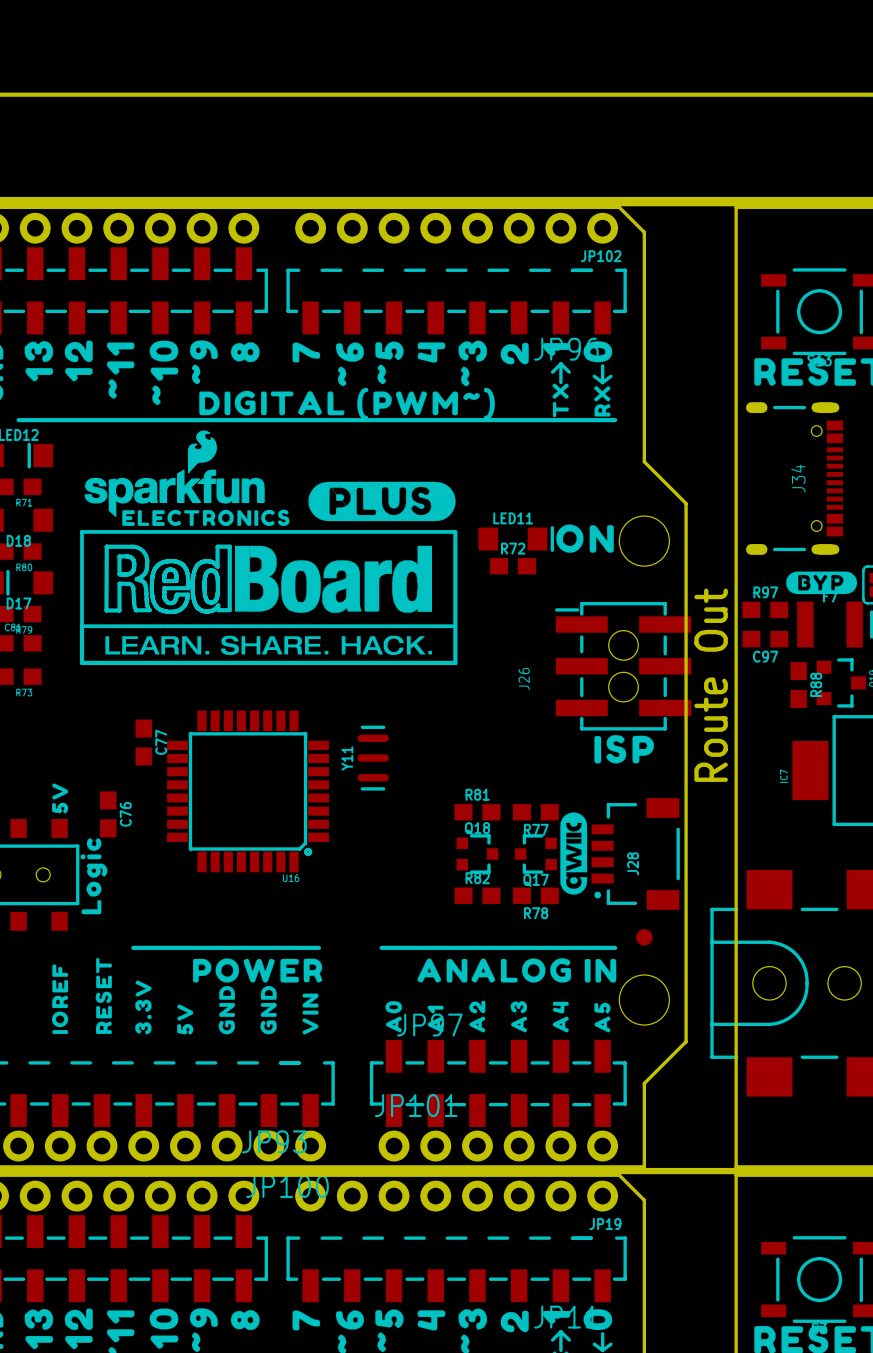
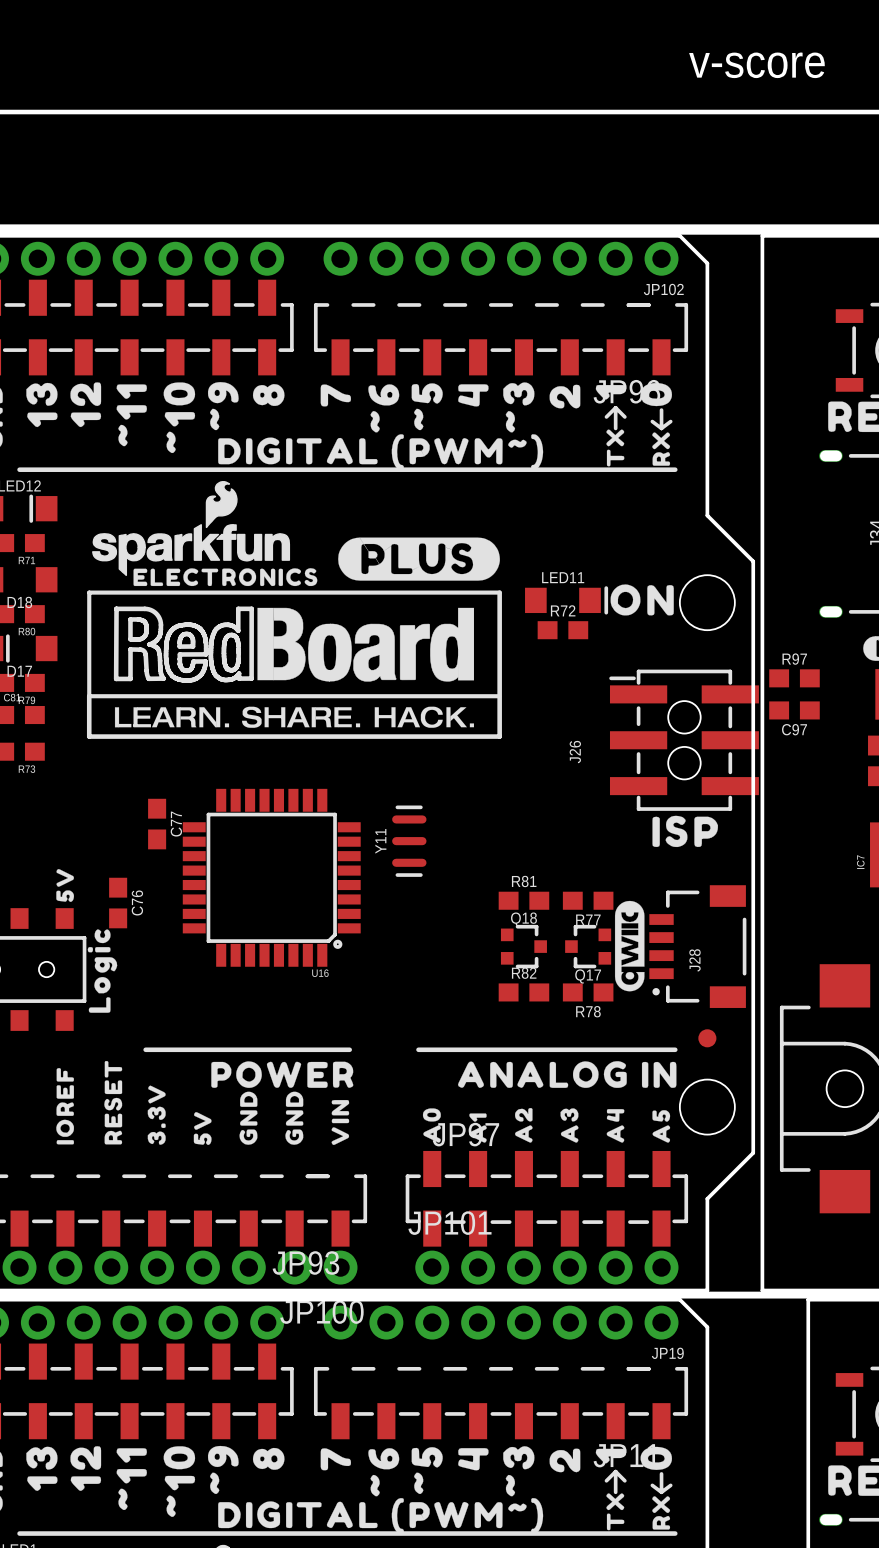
text: none -> v-score (756, 65)
board edge: (736, 207) (736, 1166) -> (808, 235) (762, 235) (762, 1290) (808, 1290)
R97 position: (765, 609) -> (794, 678)
C97 position: (765, 639) -> (794, 710)
text: Route Out (711, 685) -> none

